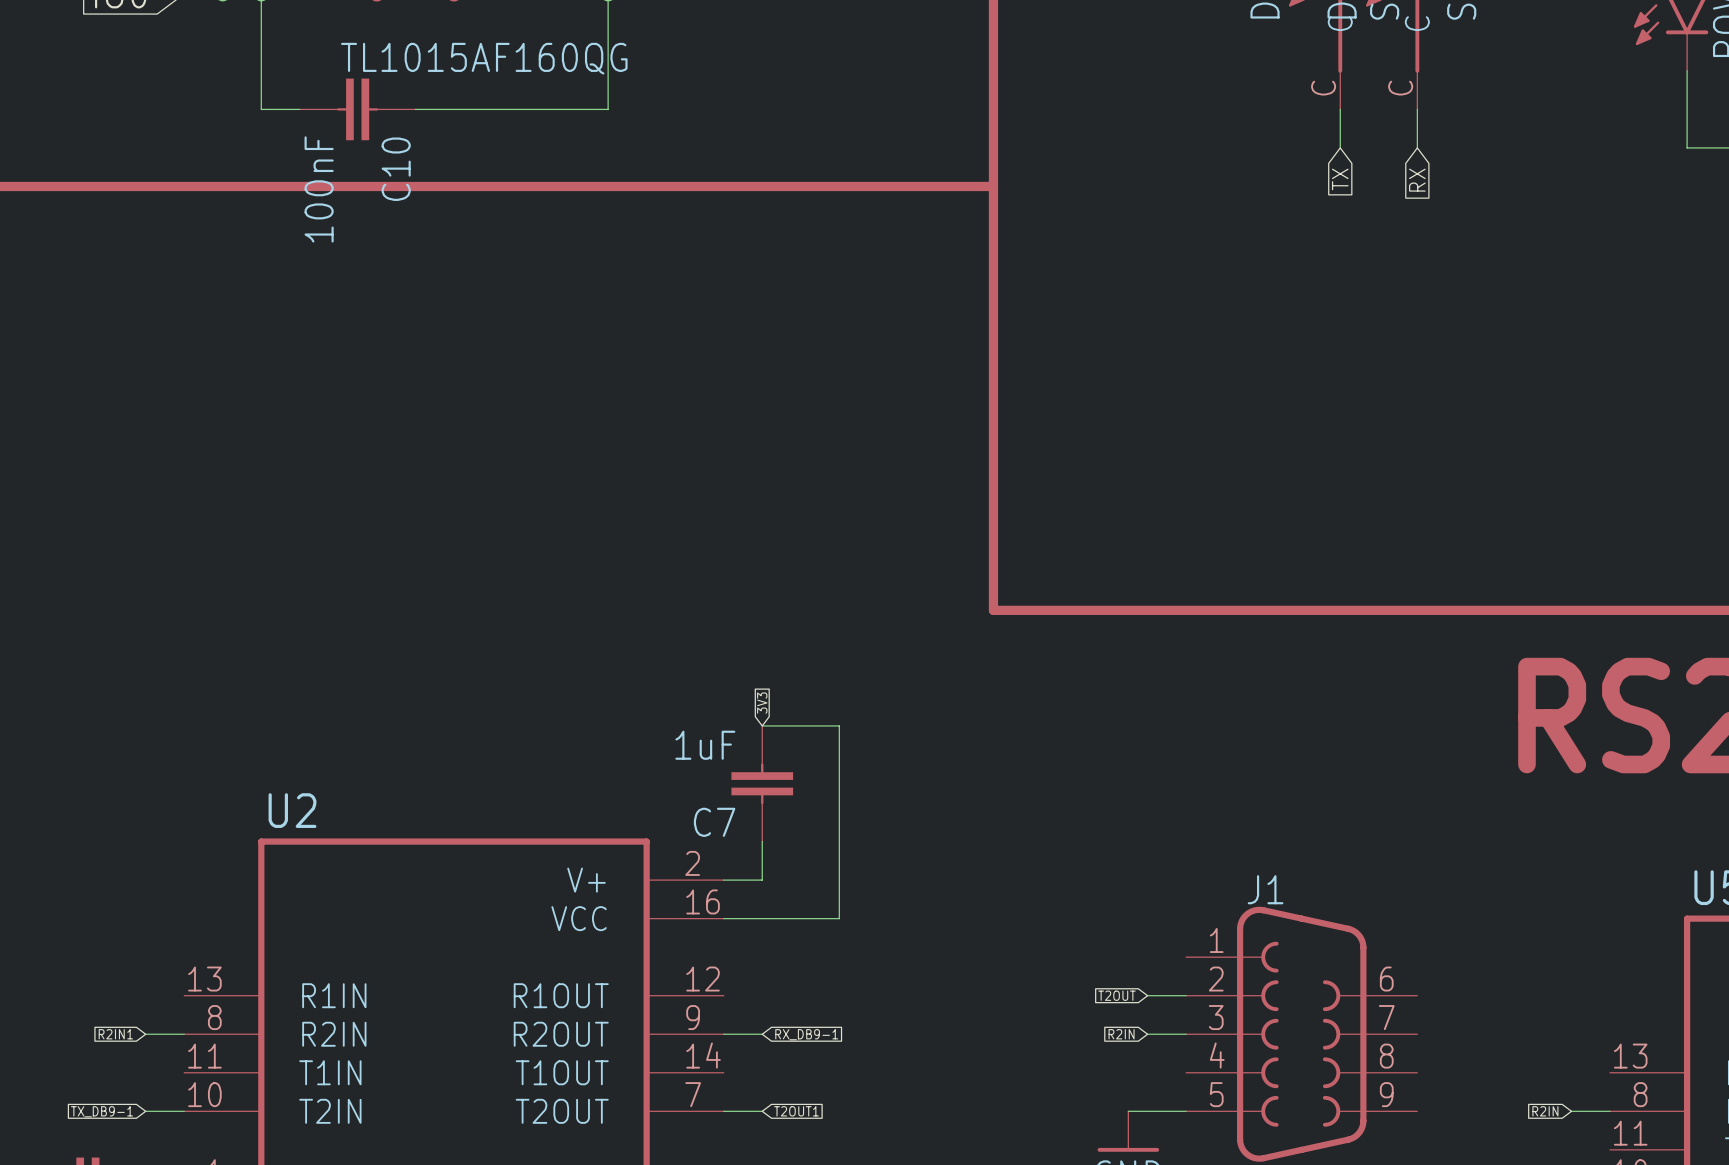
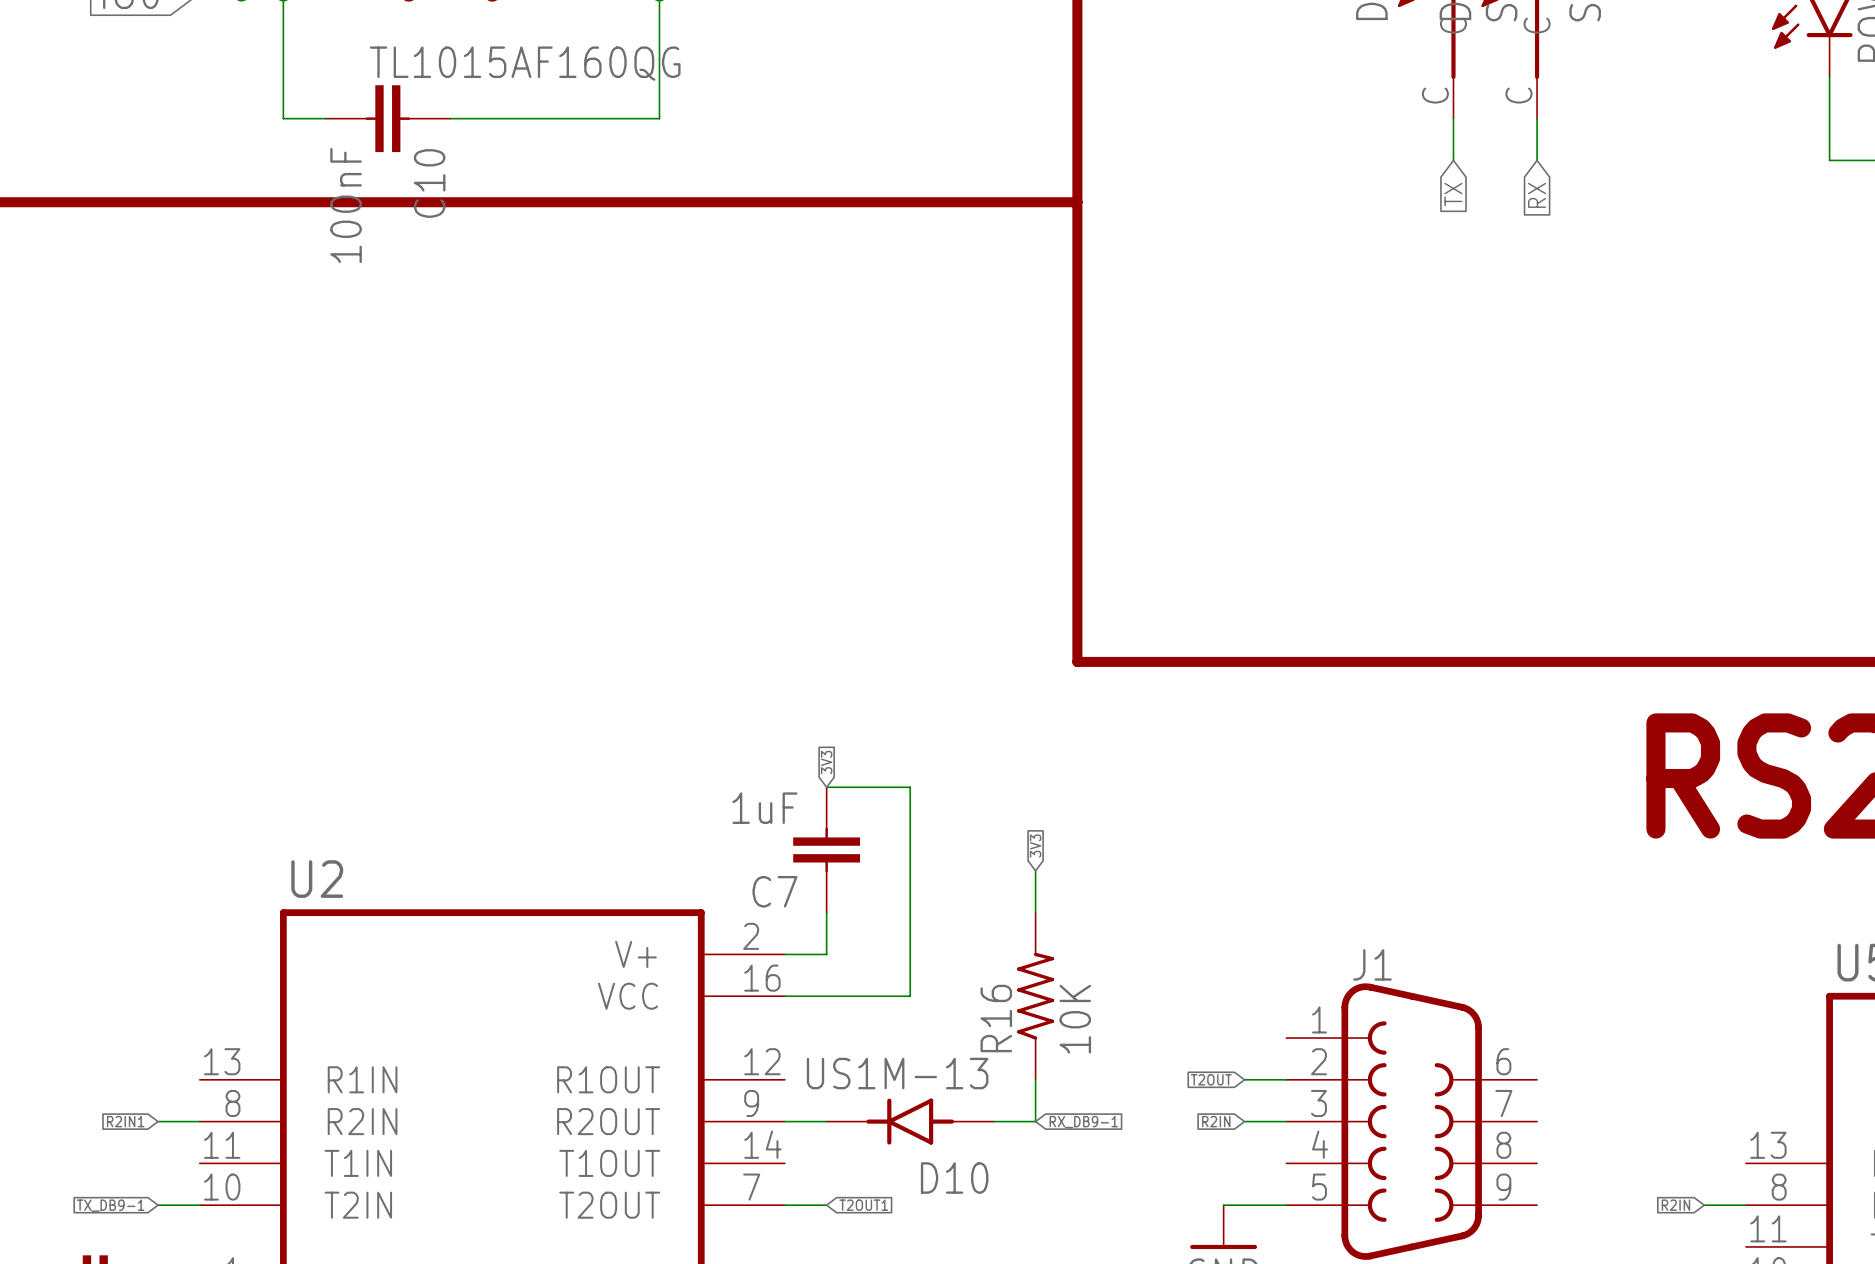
global label: none -> 3V3 (1035, 846)
wire: none -> (1035, 870) (1035, 912)
R16: none -> 10K (1035, 996)
wire: none -> (1035, 1079) (1035, 1121) (993, 1121)
global label position: RX_DB9-1 (806, 1034) -> RX_DB9-1 (1083, 1122)
D10: none -> US1M-13 (910, 1121)

